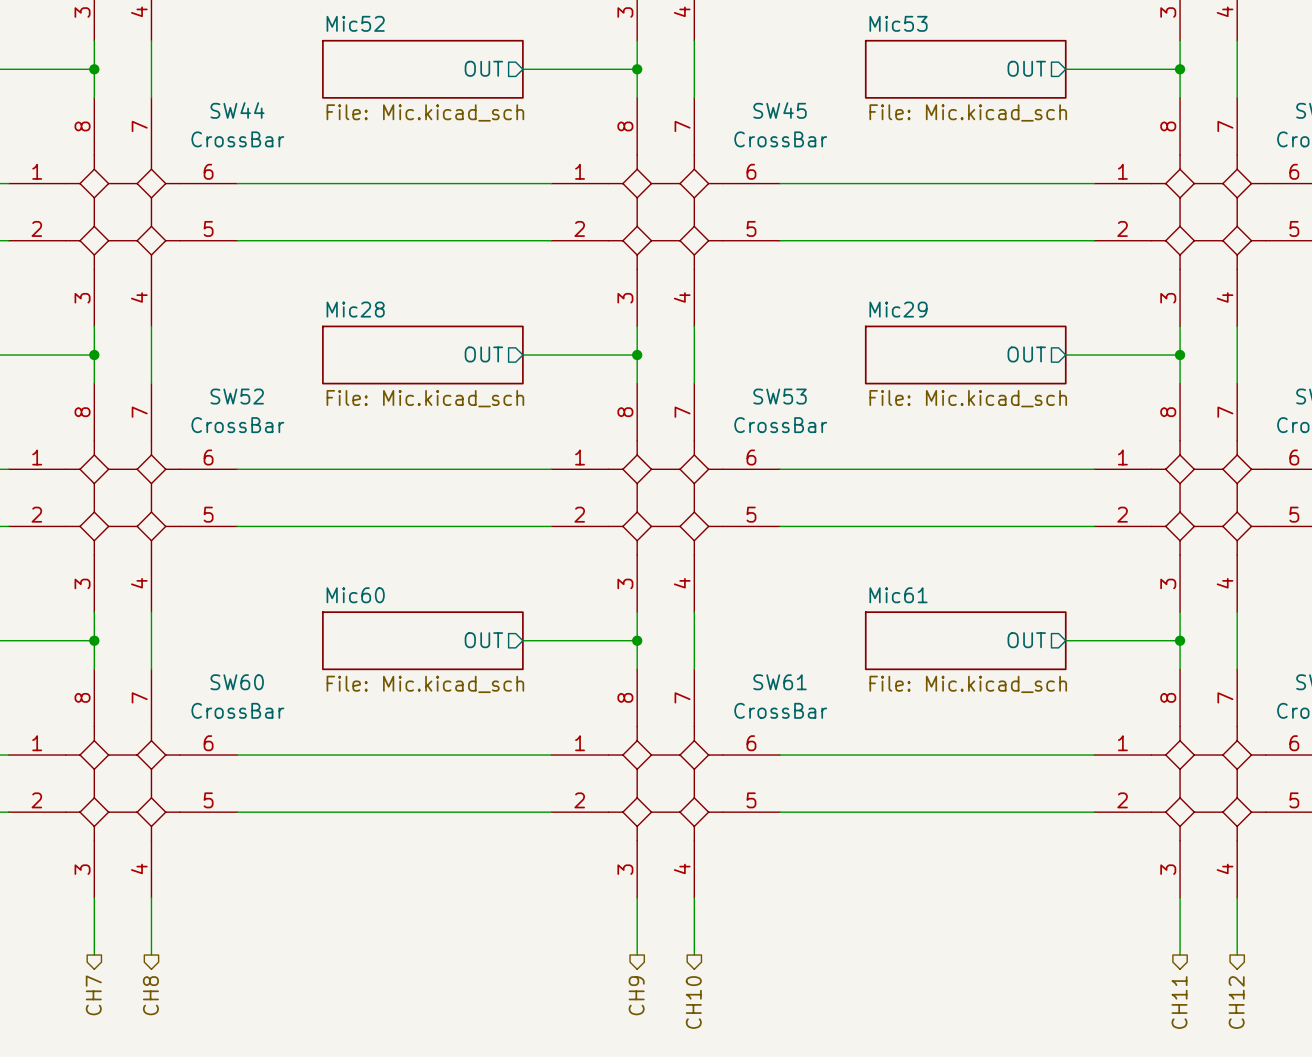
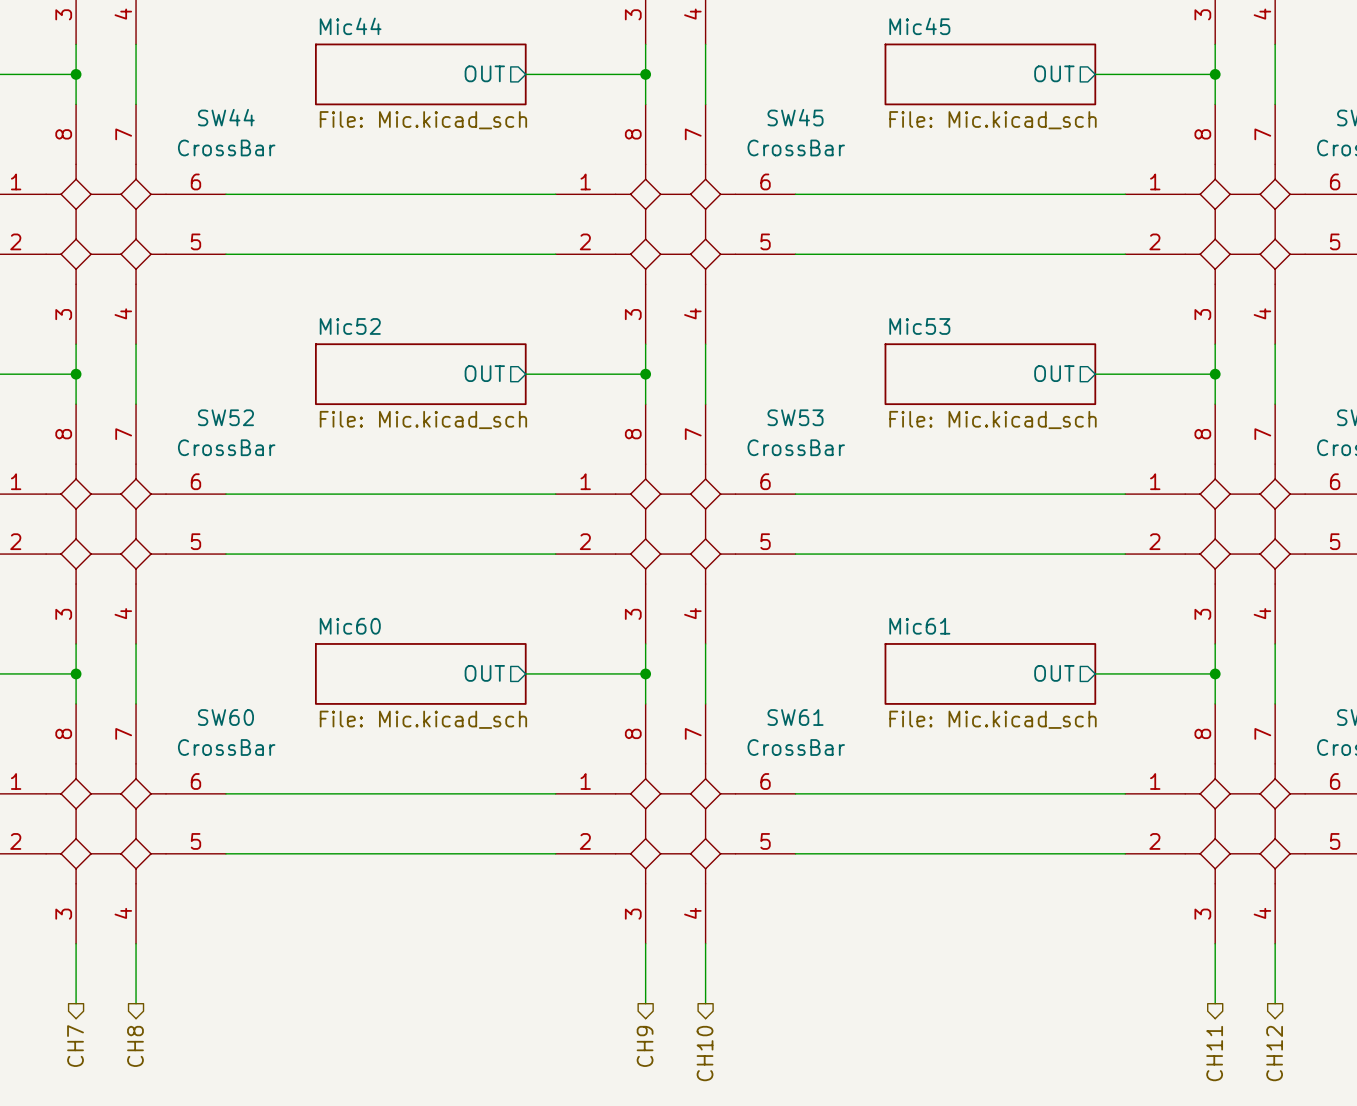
sheet Mic52 name: Mic52 (355, 23) -> Mic44 (350, 26)
sheet Mic53 name: Mic53 (898, 23) -> Mic45 (919, 26)
sheet Mic28 name: Mic28 (355, 309) -> Mic52 (350, 326)
sheet Mic29 name: Mic29 (898, 309) -> Mic53 (919, 326)

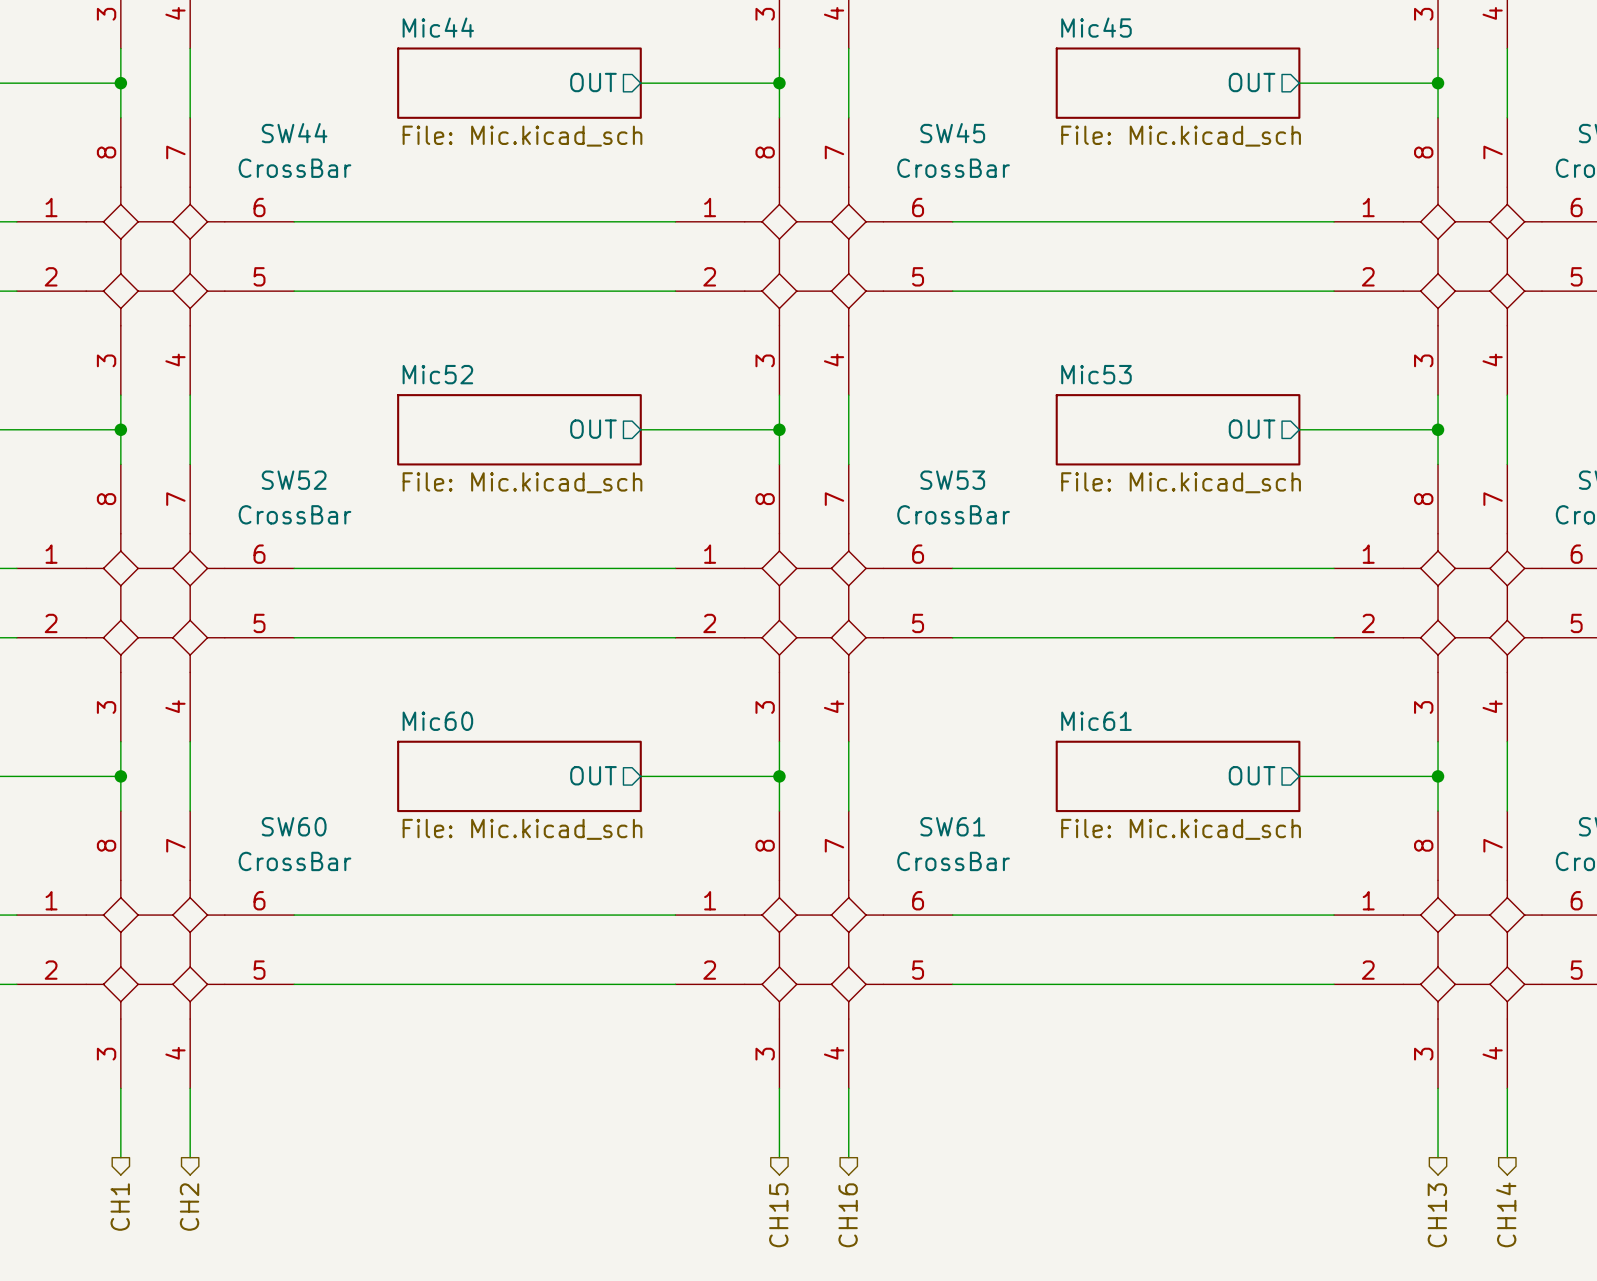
hierarchical label: CH7 (75, 1046) -> CH1 (120, 1207)
hierarchical label: CH8 (135, 1046) -> CH2 (189, 1207)
hierarchical label: CH9 (645, 1046) -> CH15 (778, 1215)
hierarchical label: CH10 (705, 1053) -> CH16 (848, 1215)
hierarchical label: CH11 (1214, 1053) -> CH13 (1437, 1215)
hierarchical label: CH12 (1274, 1053) -> CH14 (1506, 1214)

